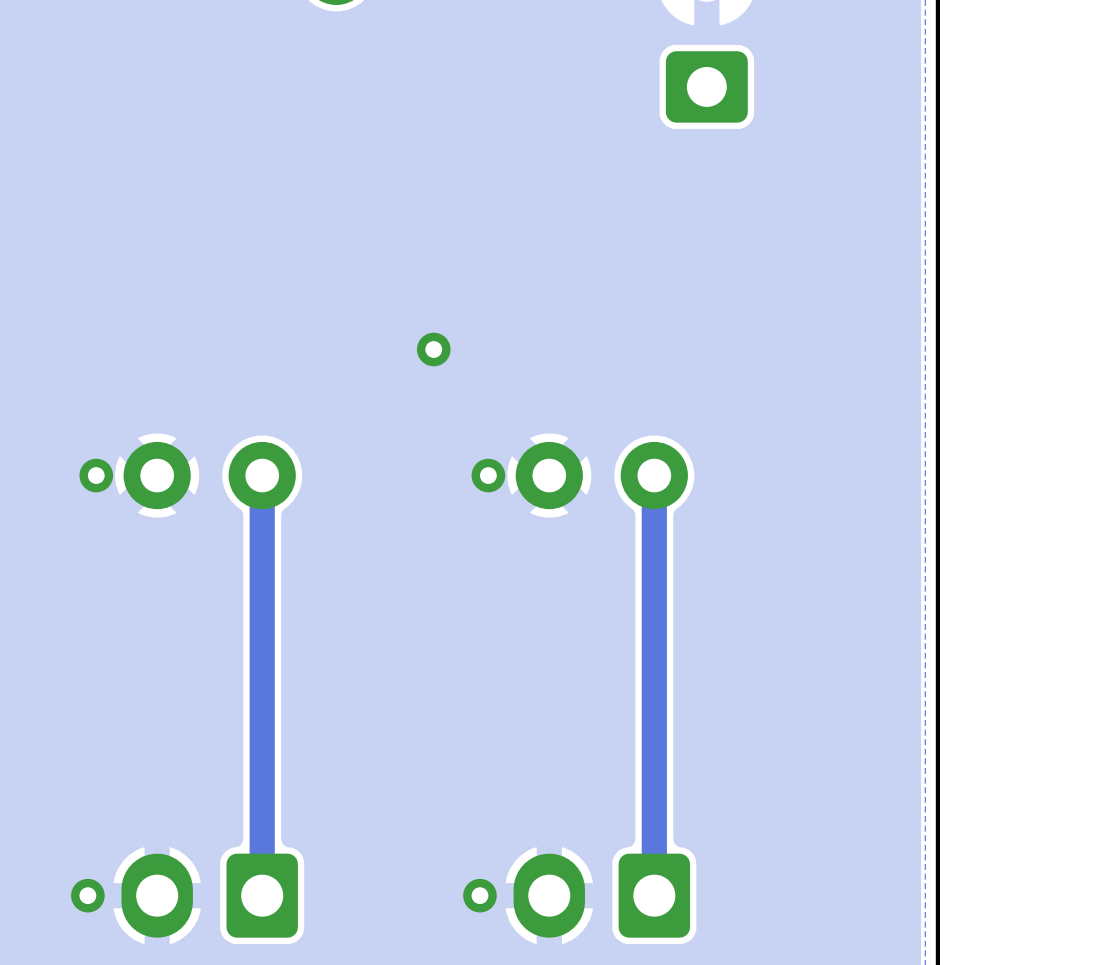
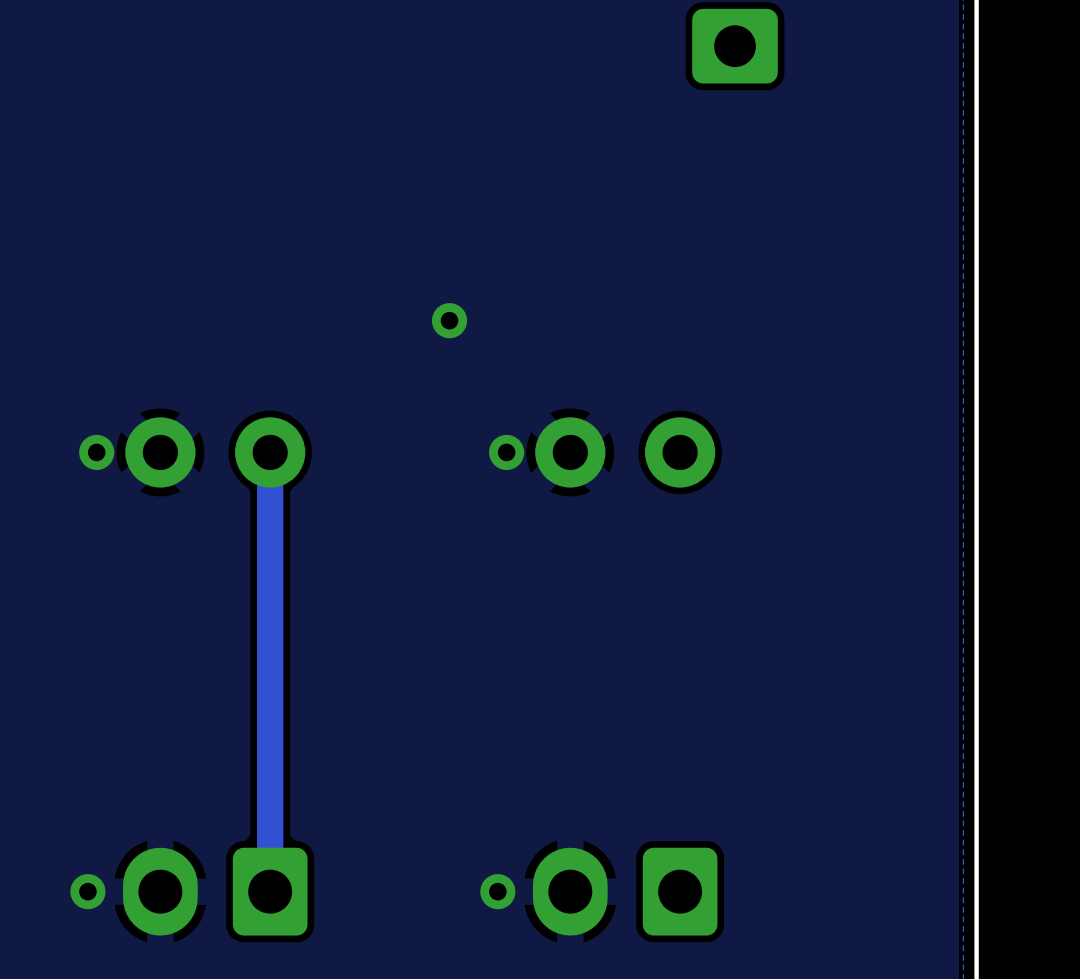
track: (654, 475) (654, 895) -> none

